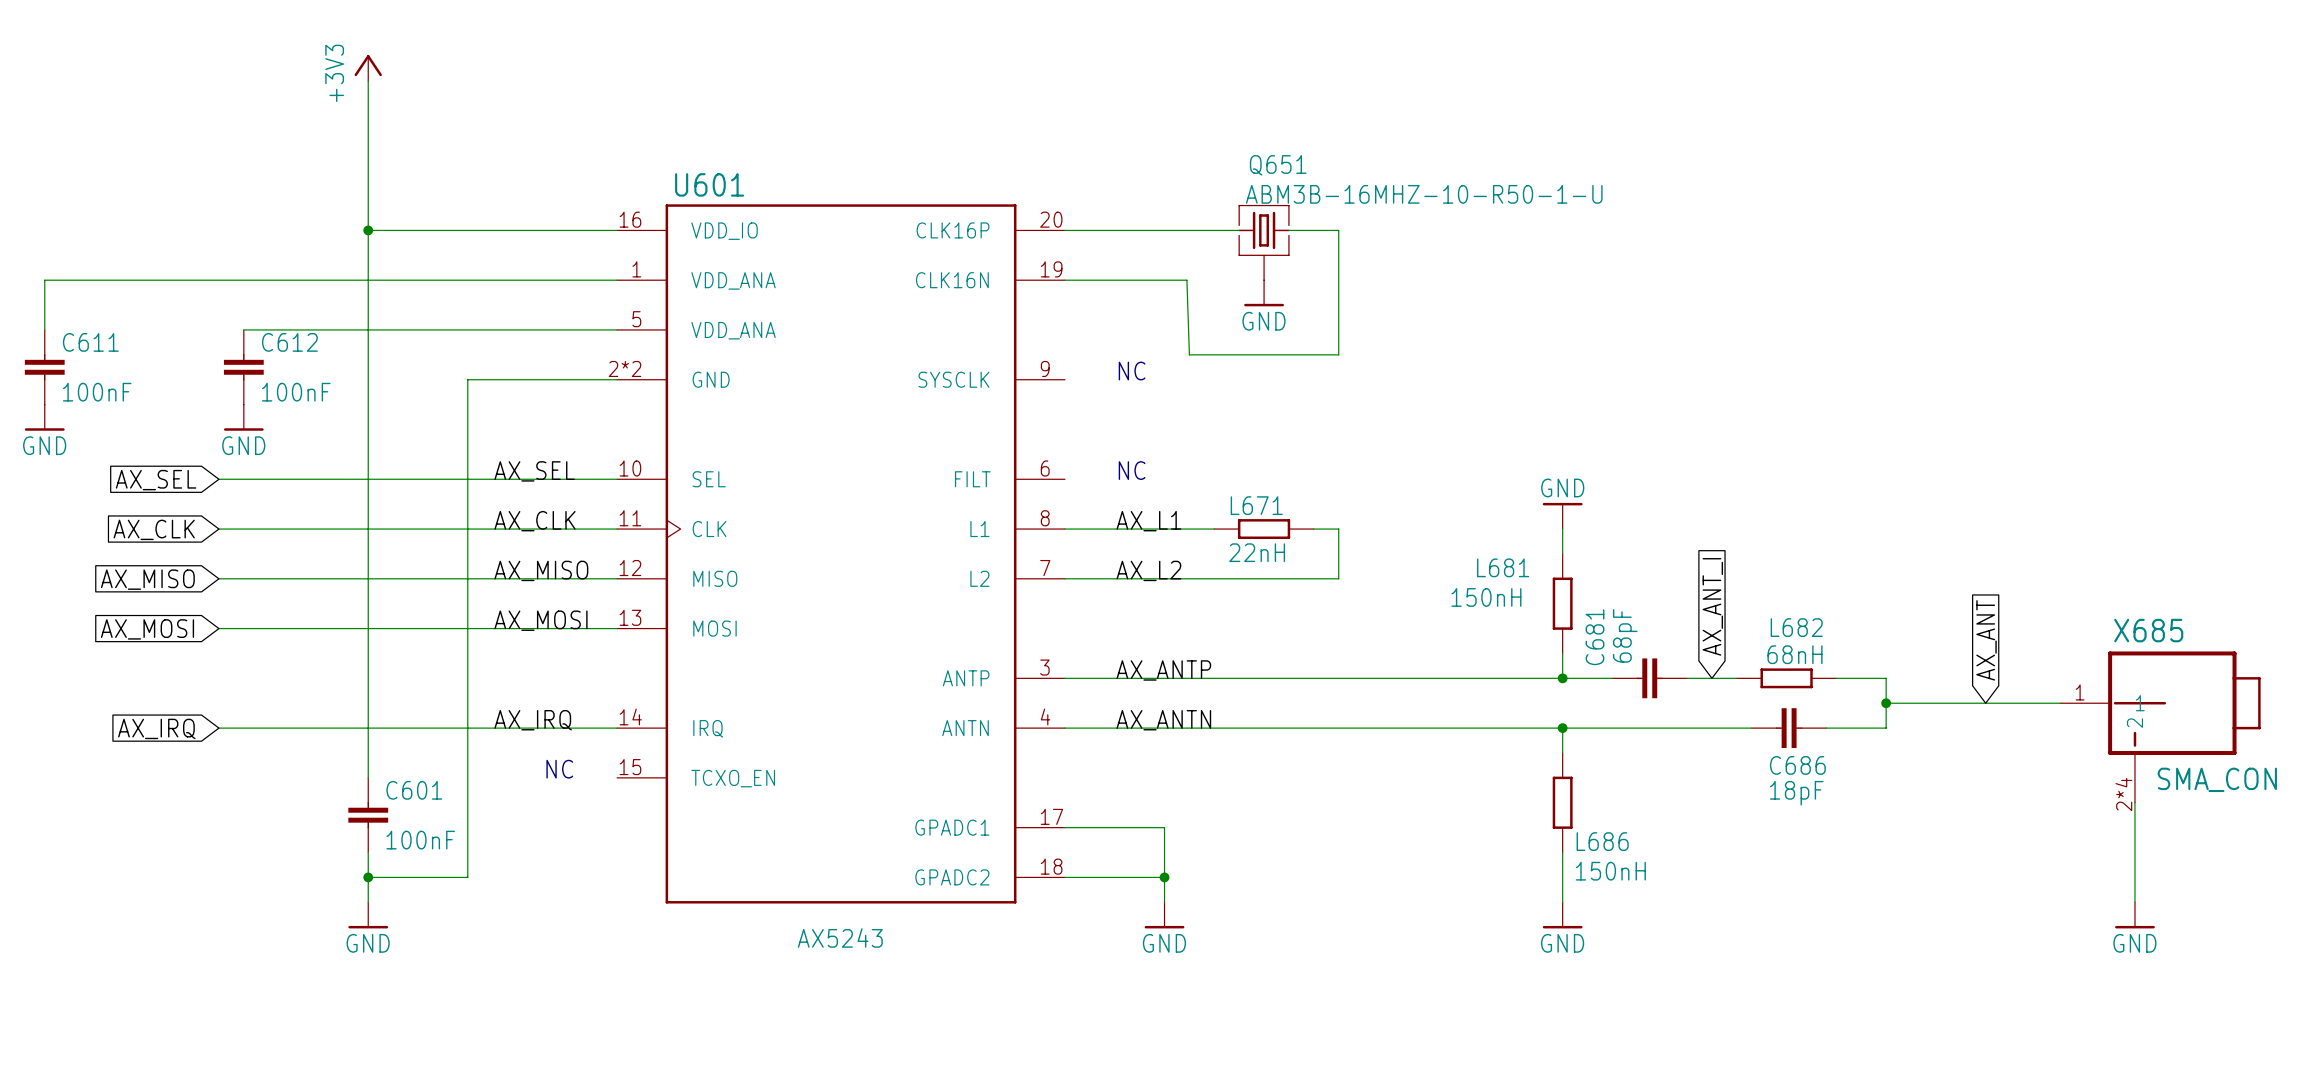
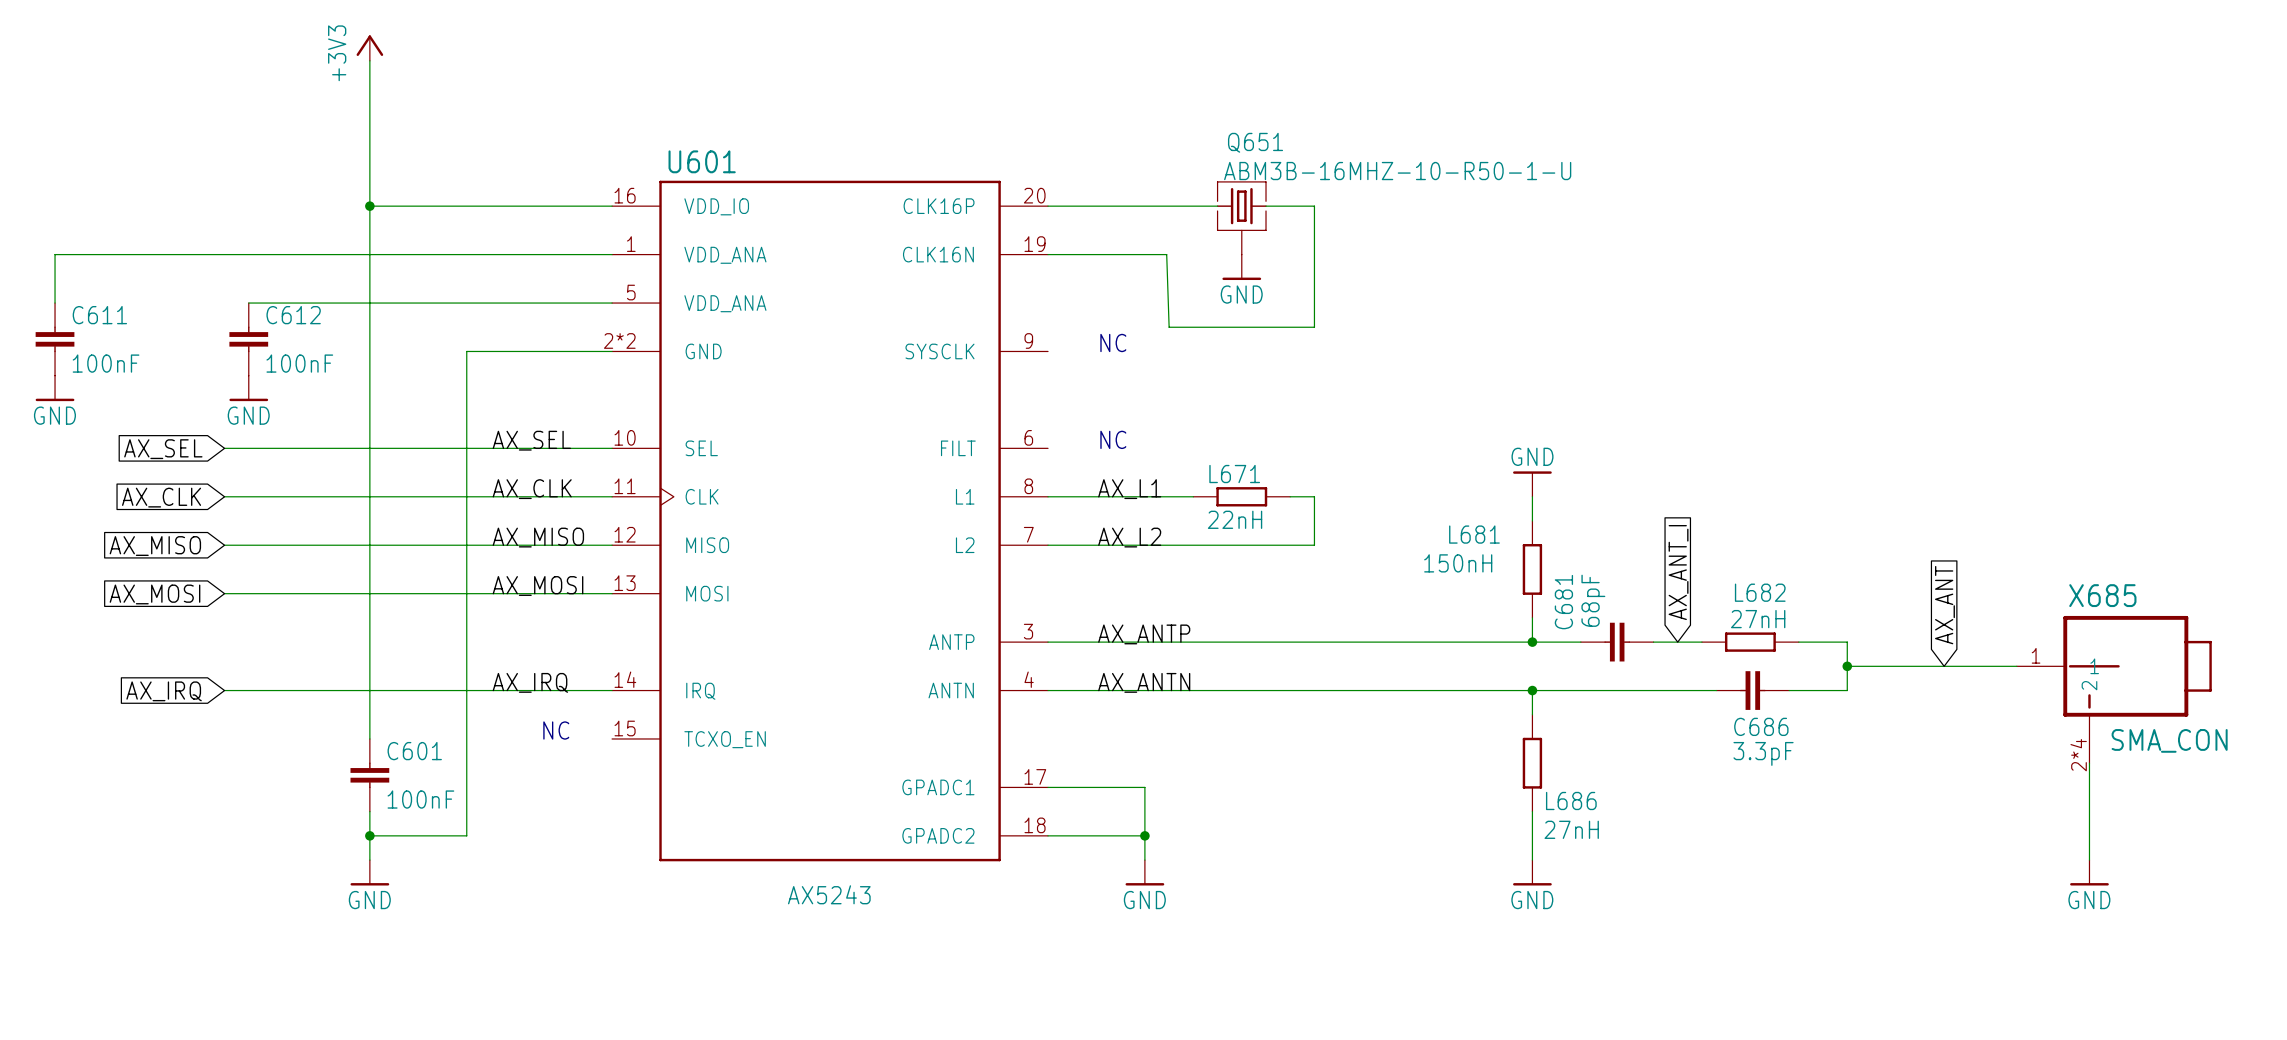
L682 value: 68nH (1794, 654) -> 27nH (1758, 619)
C686 value: 18pF (1796, 793) -> 3.3pF (1763, 753)
L686 value: 150nH (1610, 871) -> 27nH (1571, 829)

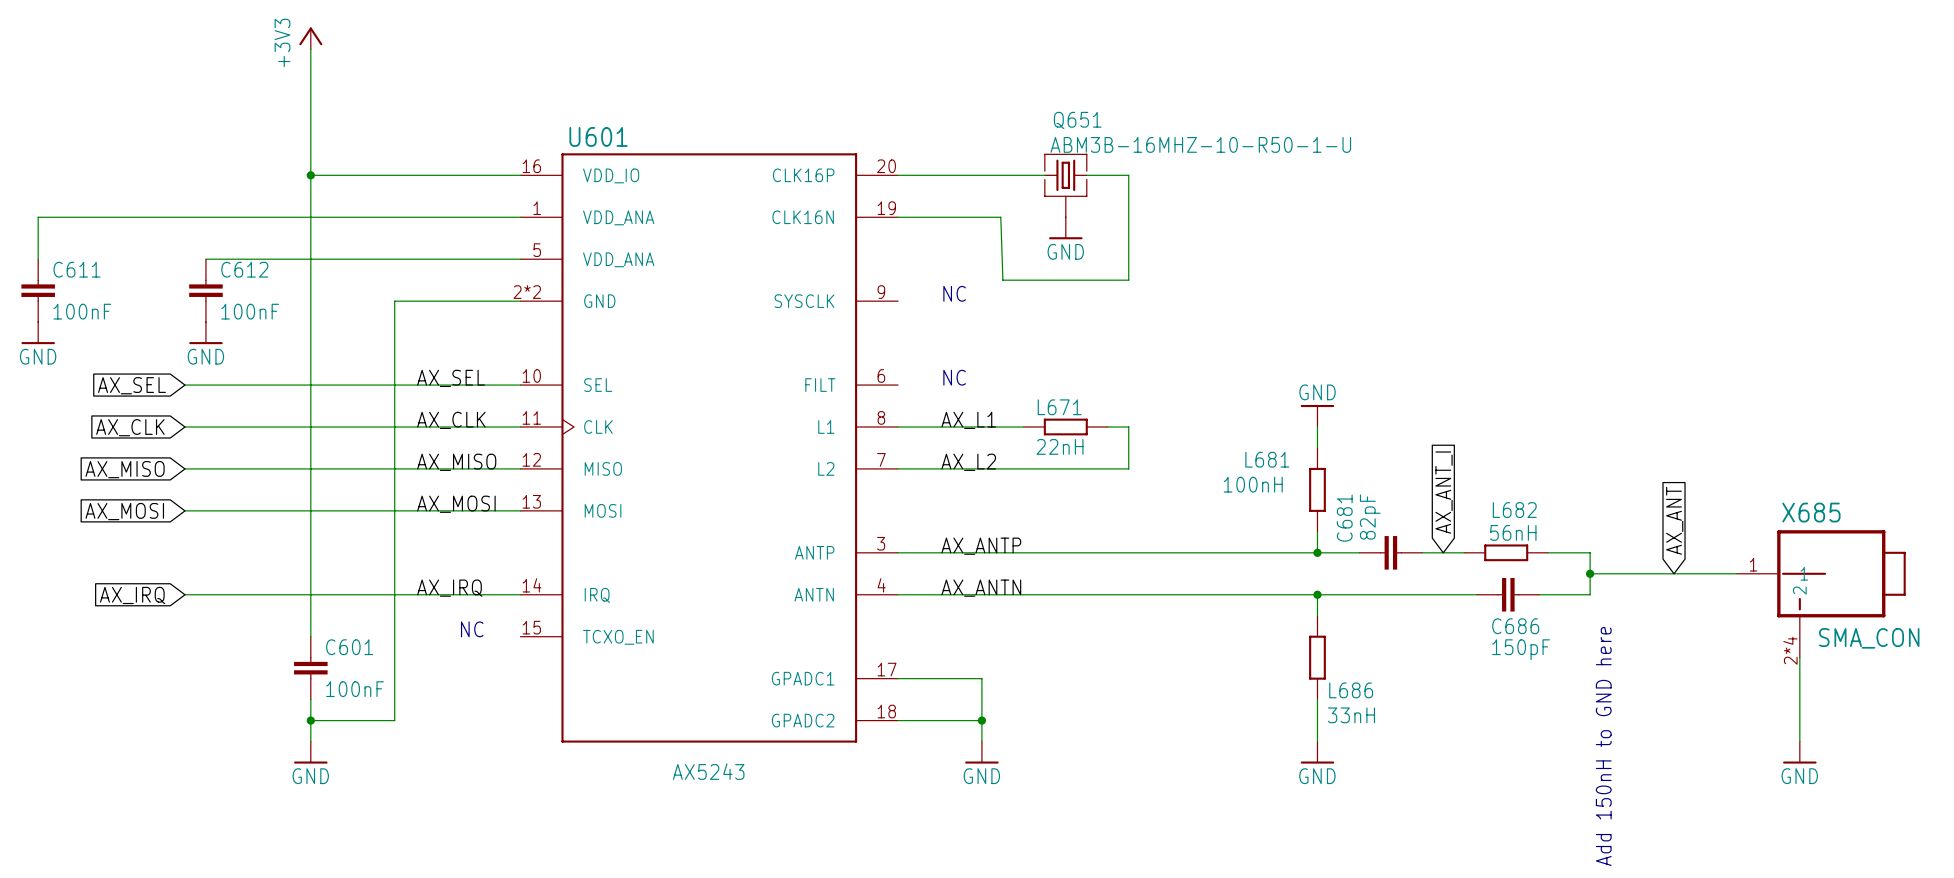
L681 value: 150nH (1458, 563) -> 100nH (1253, 484)
C681 value: 68pF (1593, 600) -> 82pF (1370, 517)
L682 value: 27nH (1758, 619) -> 56nH (1513, 532)
C686 value: 3.3pF (1763, 753) -> 150pF (1521, 649)
L686 value: 27nH (1571, 829) -> 33nH (1351, 715)
text: none -> Add 150nH to GND here (1603, 746)

